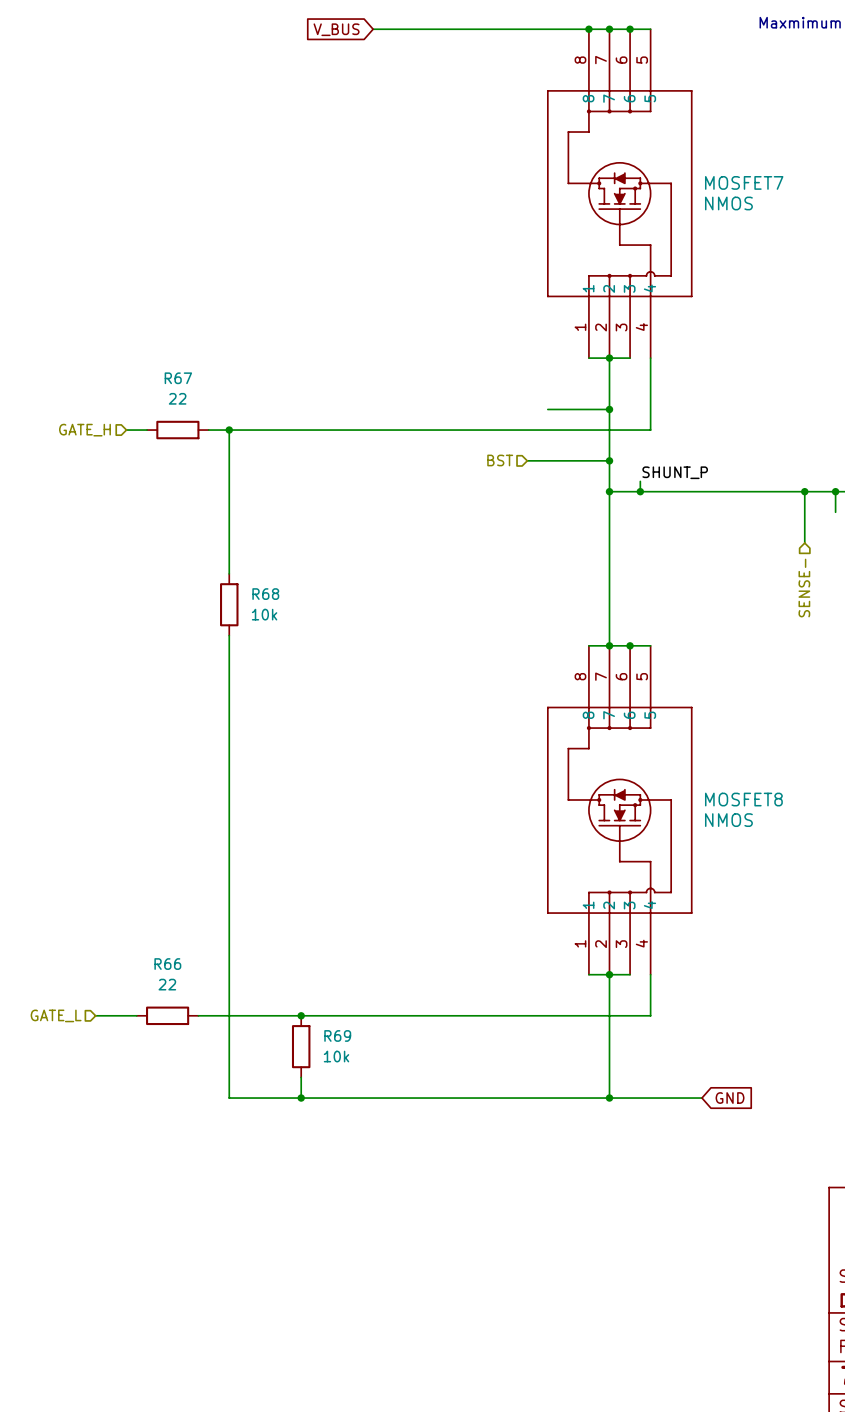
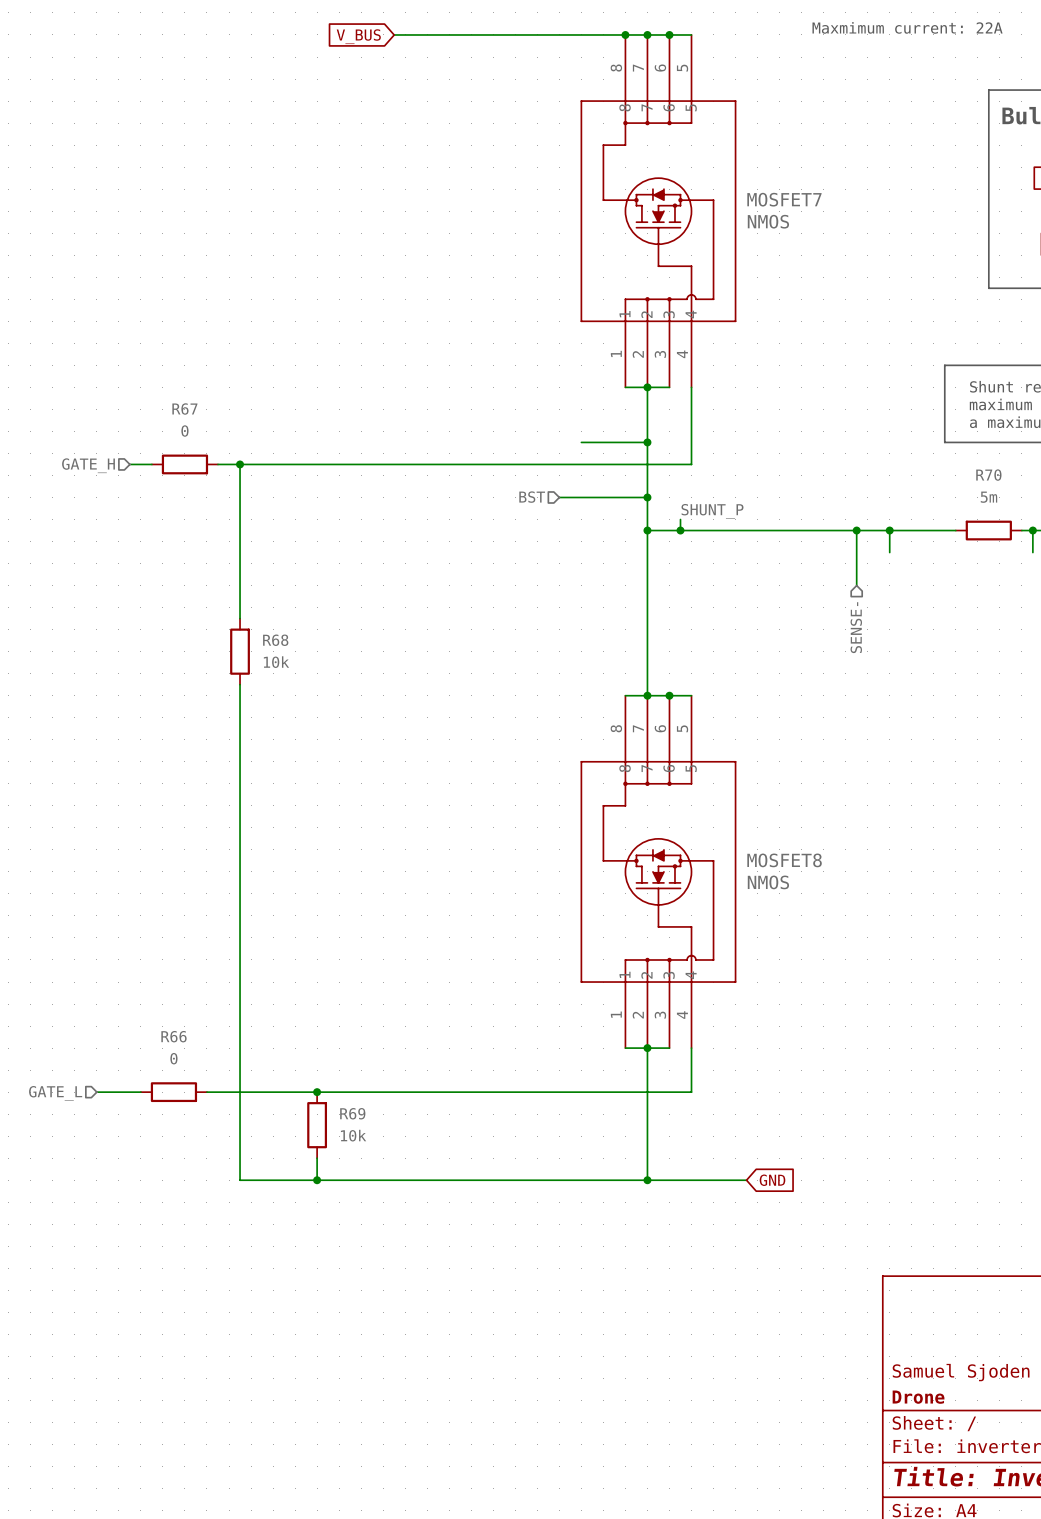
R67 value: 22 (177, 398) -> 0 (184, 431)
R66 value: 22 (167, 984) -> 0 (173, 1058)

